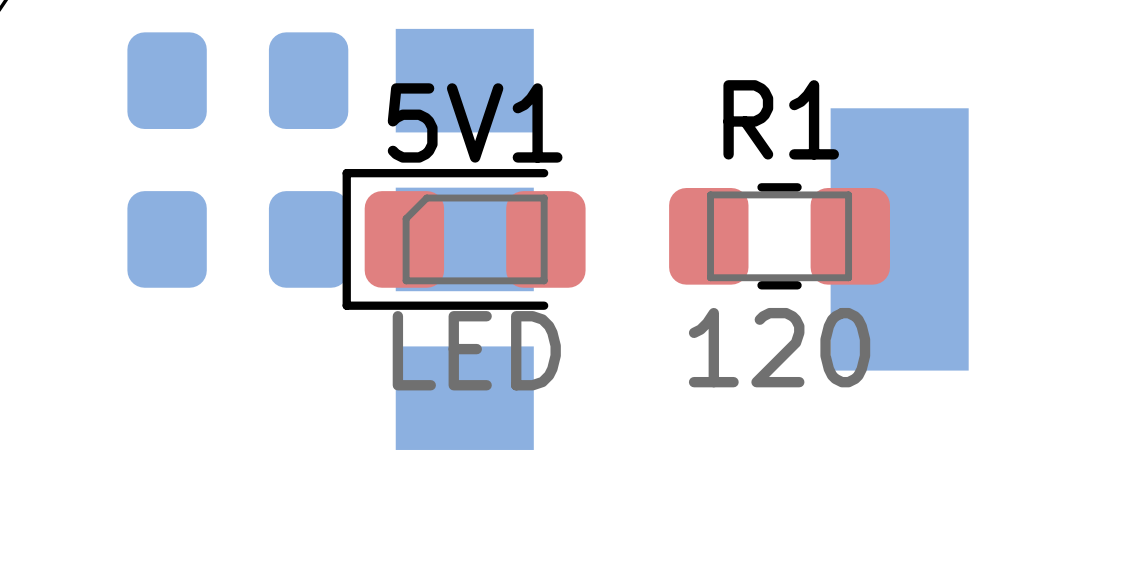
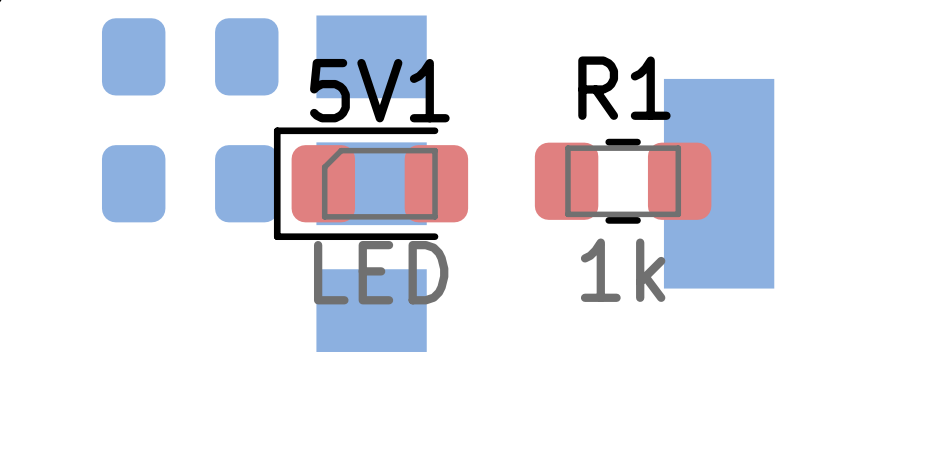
R1 value: 120 (779, 347) -> 1k (623, 270)

